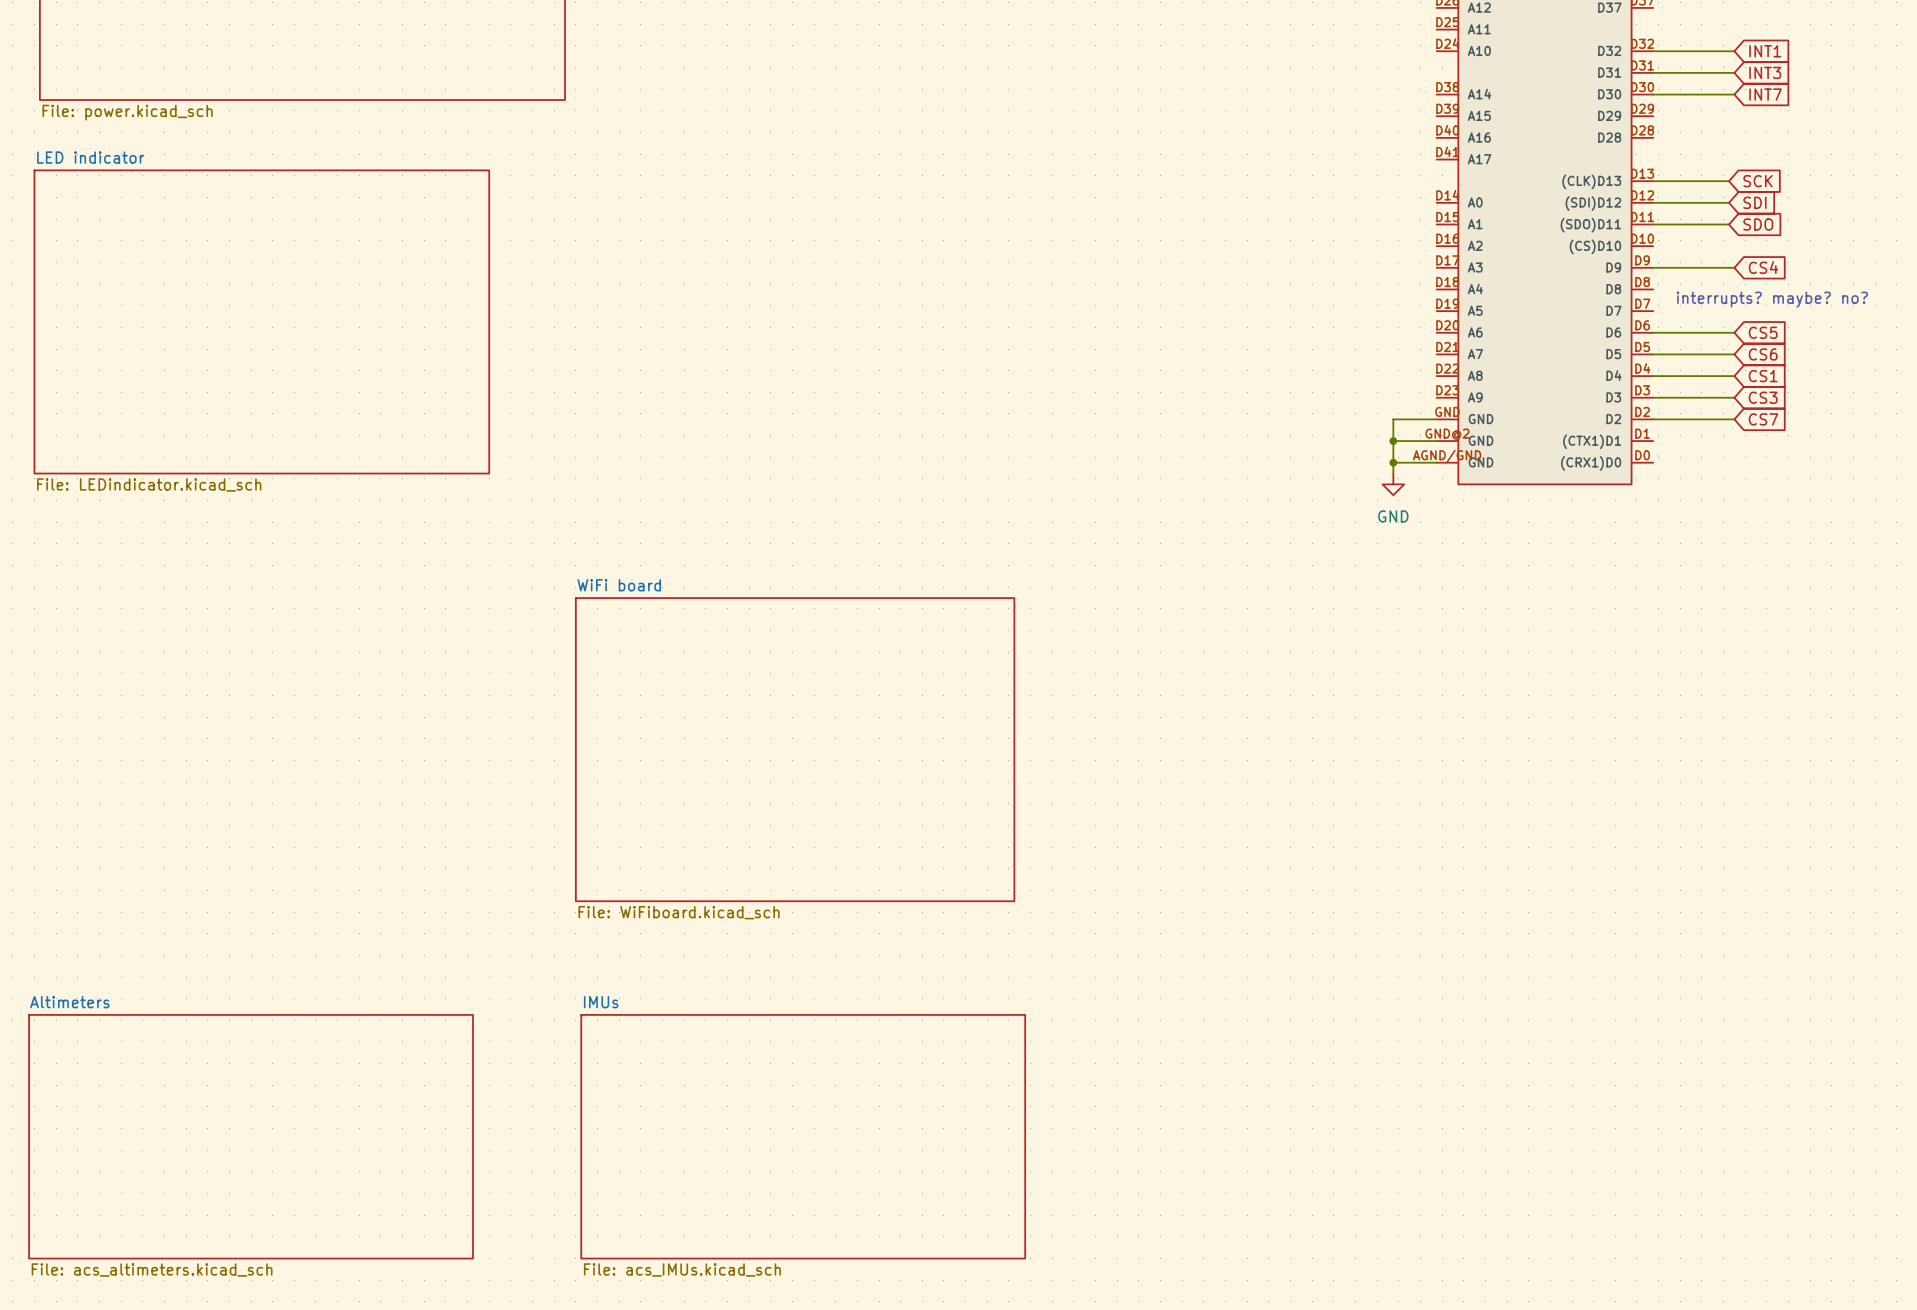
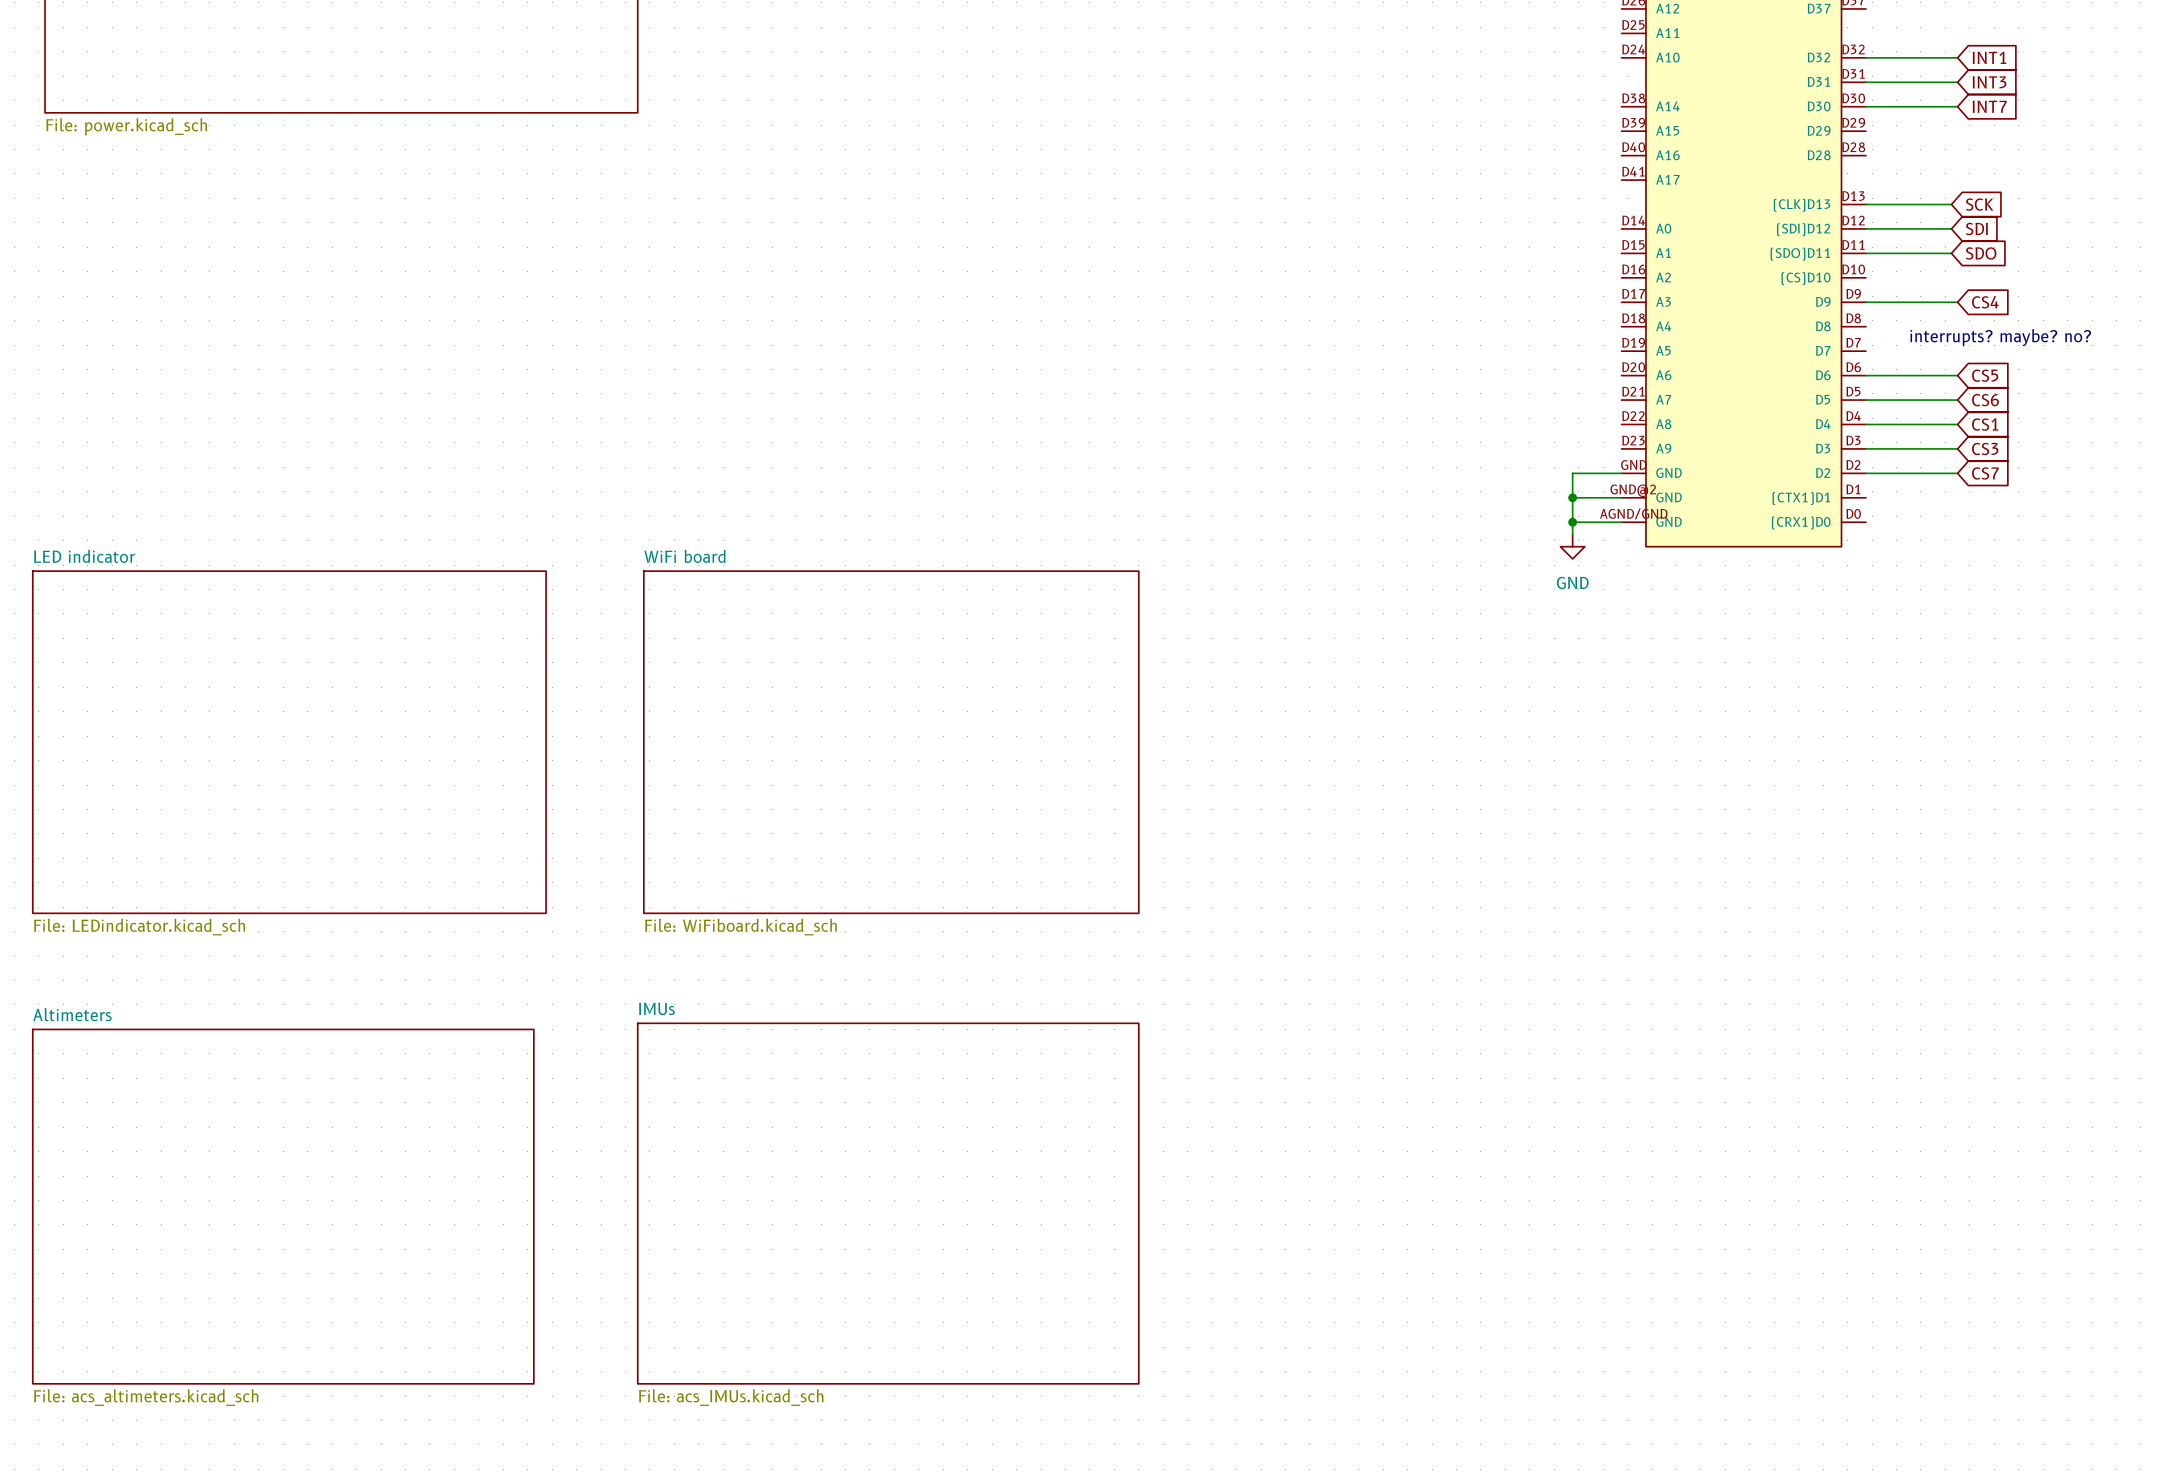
sheet LED indicator: File: LEDindicator.kicad_sch (261, 321) -> none
sheet LED indicator: none -> File: LEDindicator.kicad_sch (289, 742)
sheet WiFi board position: (795, 749) -> (891, 742)
sheet IMUs: none -> File: acs_IMUs.kicad_sch (888, 1203)
sheet Altimeters: none -> File: acs_altimeters.kicad_sch (283, 1206)
sheet Altimeters: File: acs_altimeters.kicad_sch (251, 1136) -> none
sheet IMUs: File: acs_IMUs.kicad_sch (803, 1136) -> none

